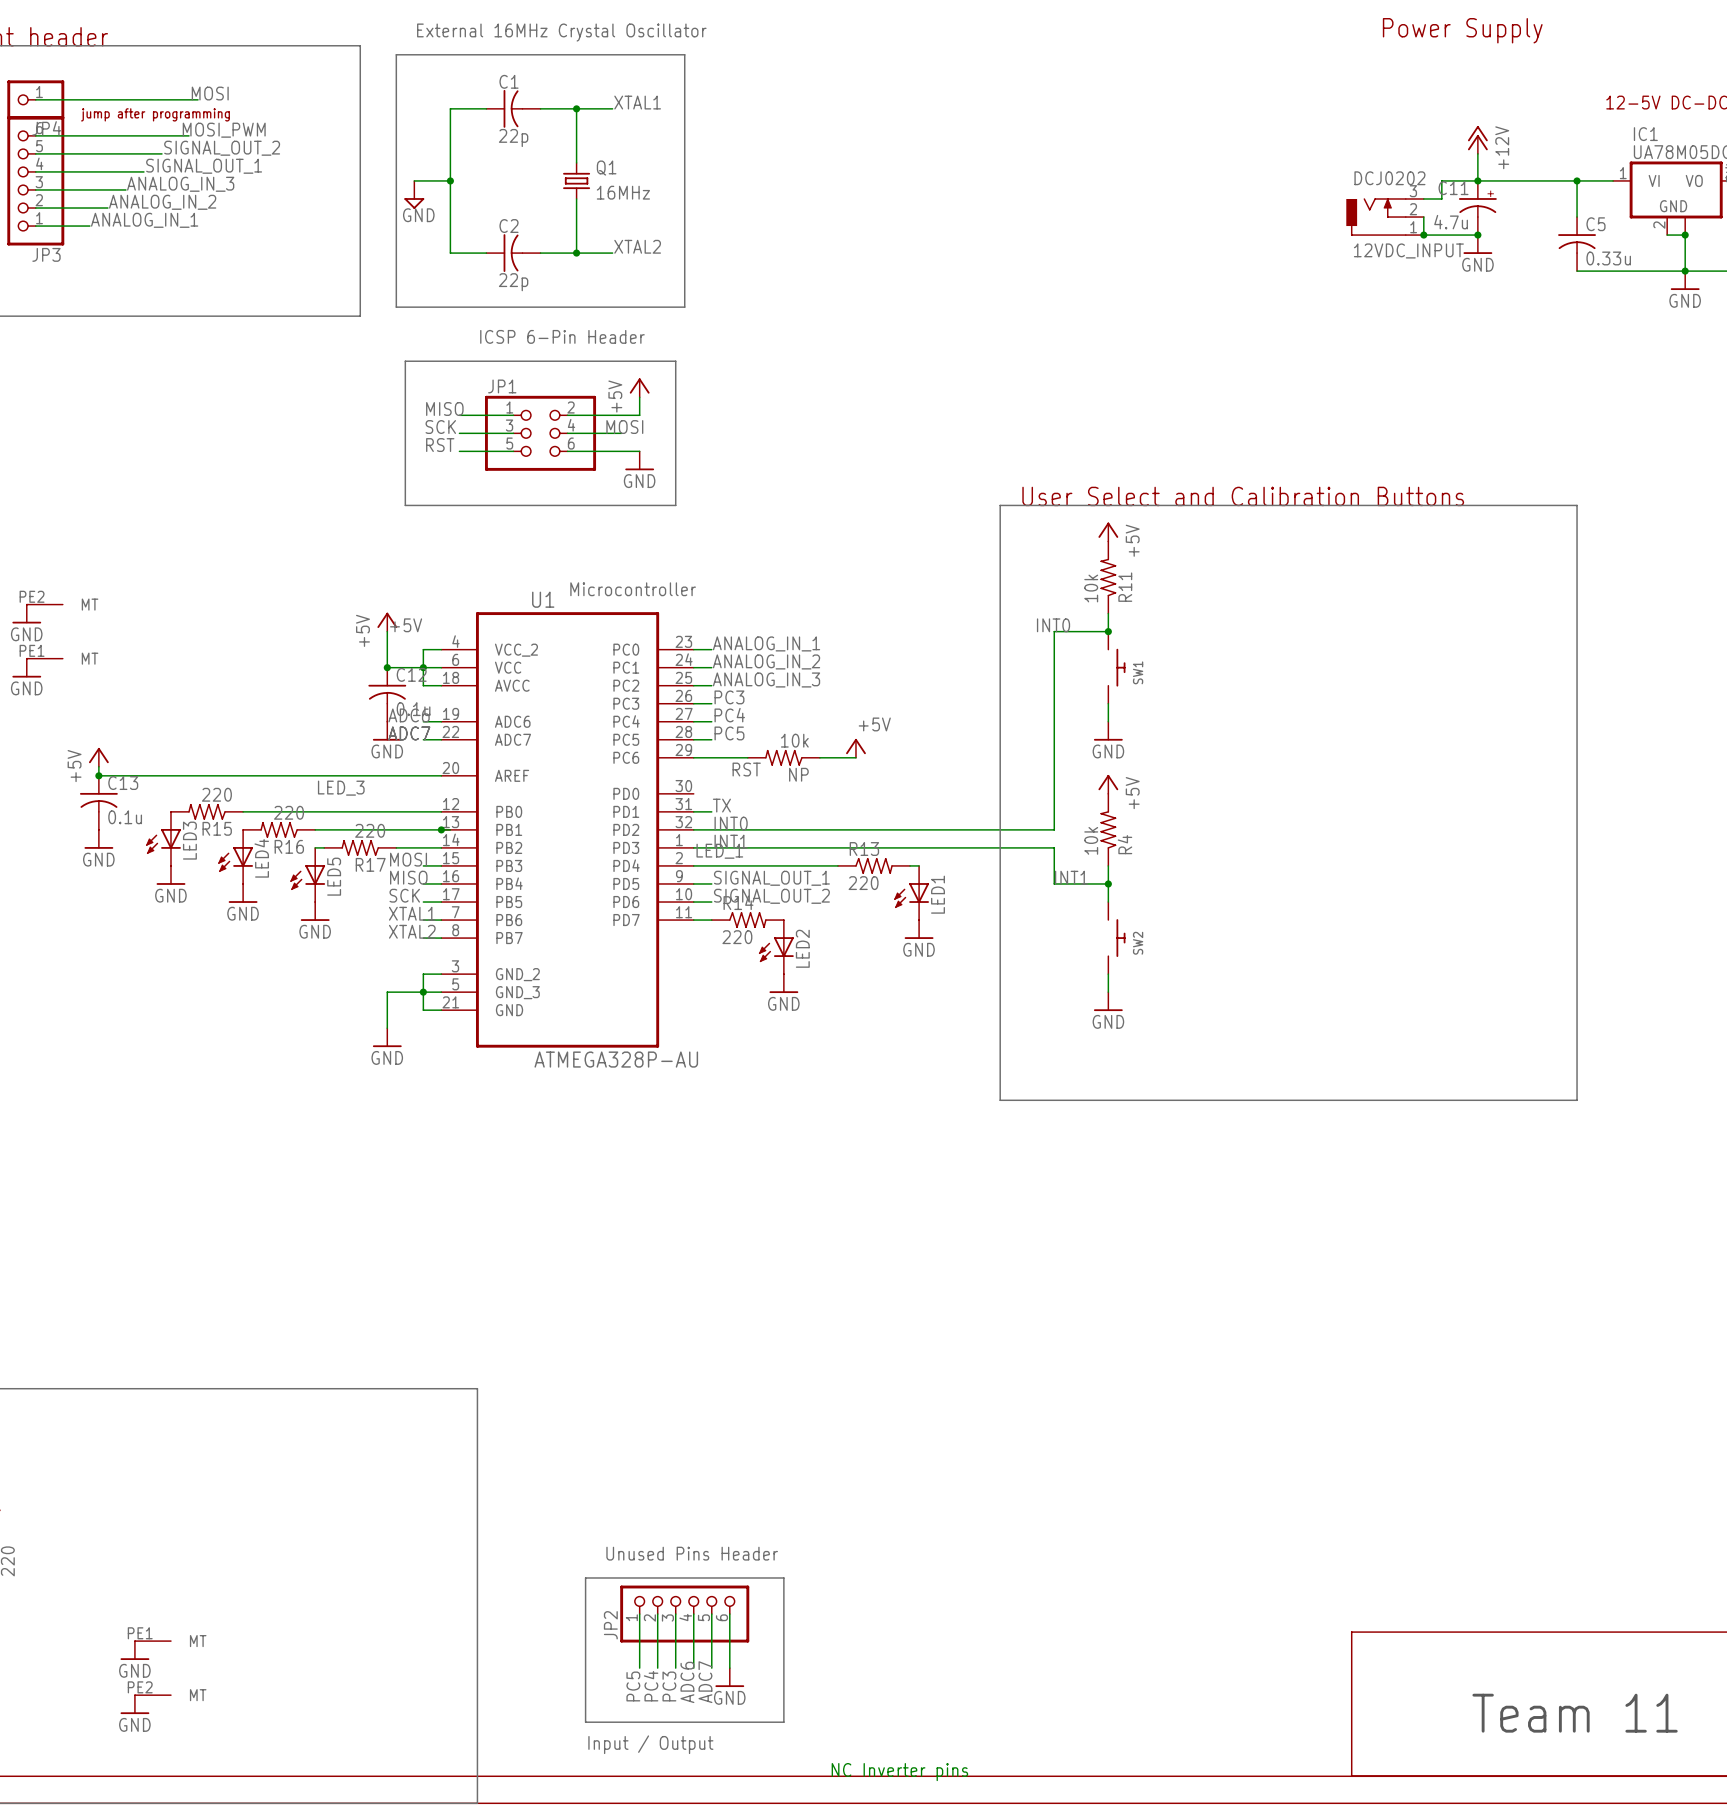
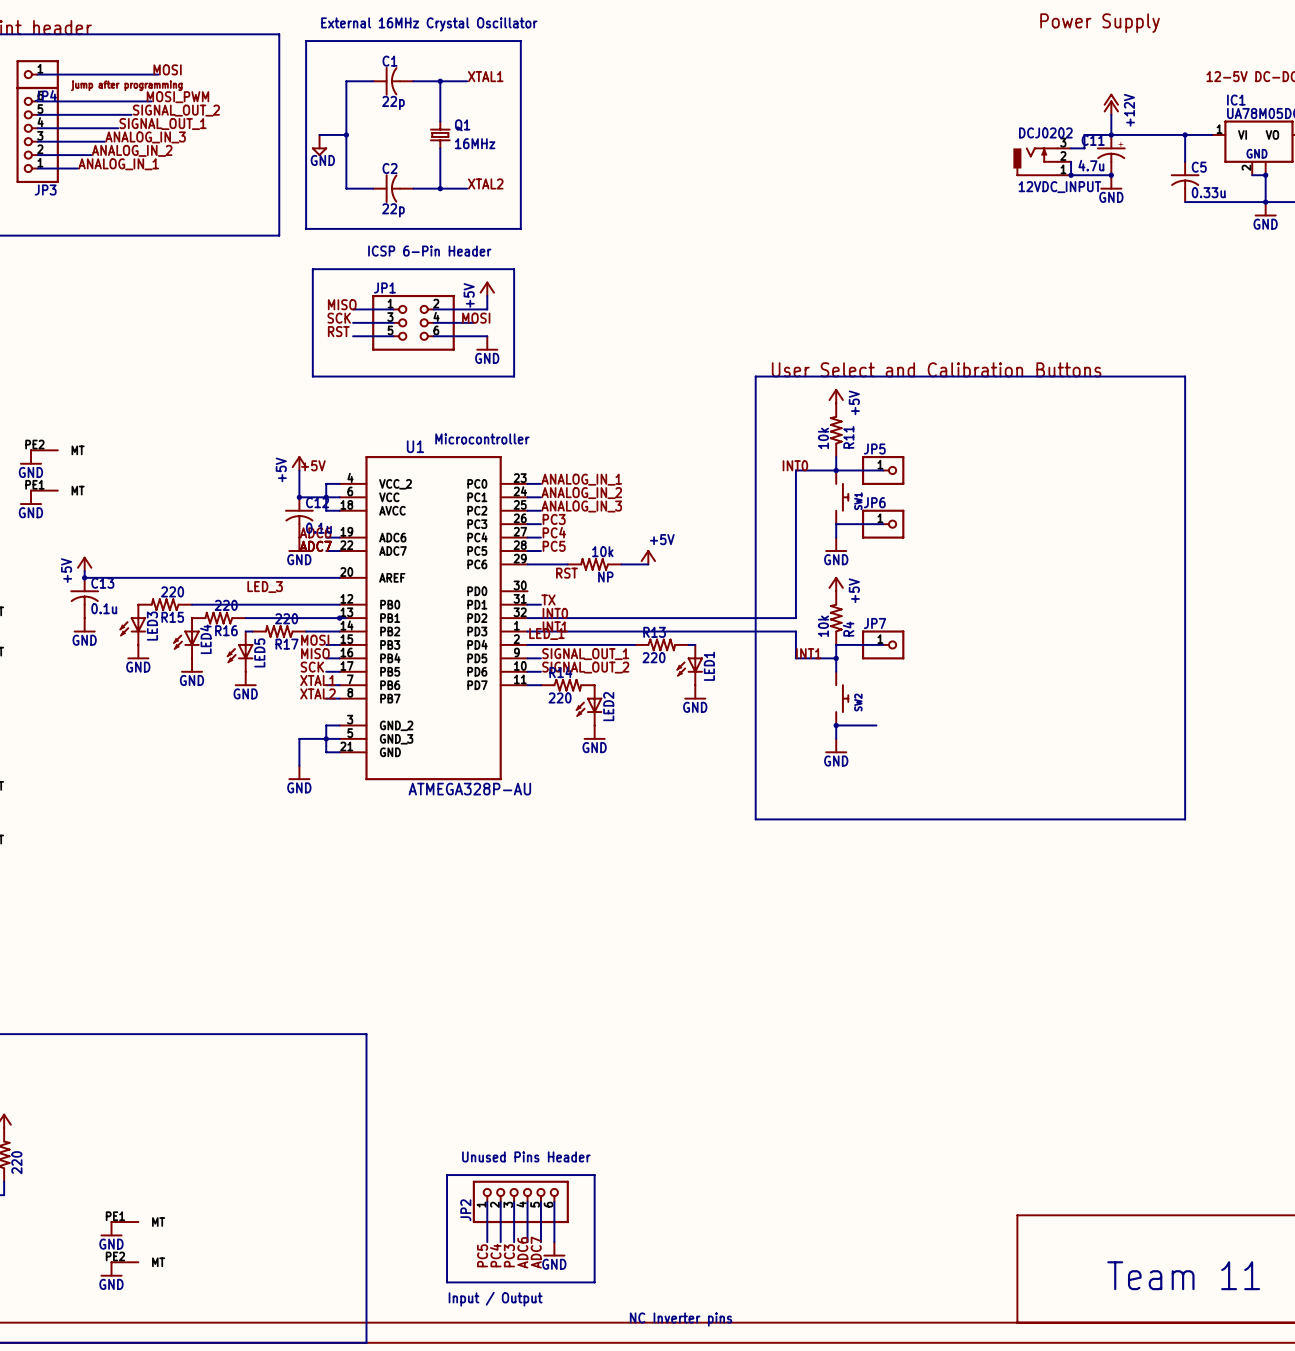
wire: none -> (836, 470) (883, 470)
JP5: none -> (883, 470)
wire: none -> (836, 524) (883, 524)
JP6: none -> (883, 524)
wire: none -> (836, 644) (883, 644)
JP7: none -> (883, 644)
wire: none -> (836, 725) (876, 725)
junction: none -> (836, 725)

